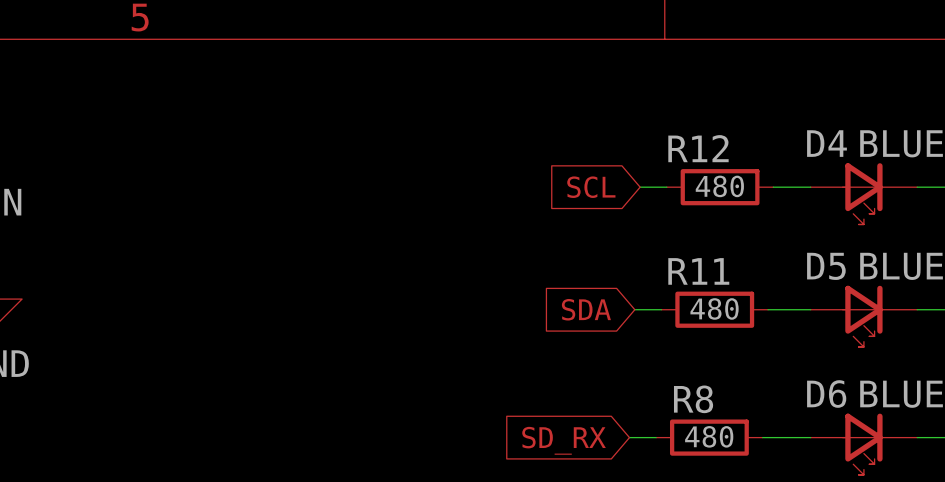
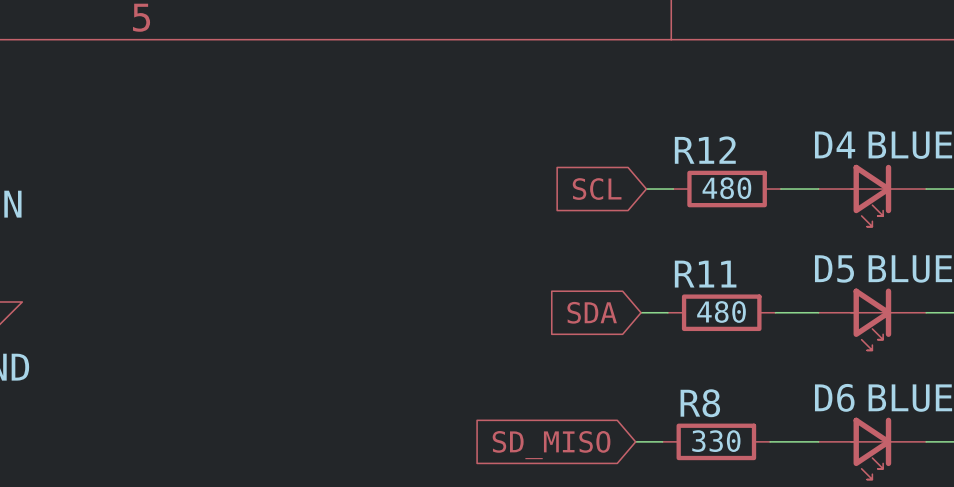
R8 value: 480 (709, 436) -> 330 (716, 441)
global label: SD_RX (564, 440) -> SD_MISO (551, 445)

